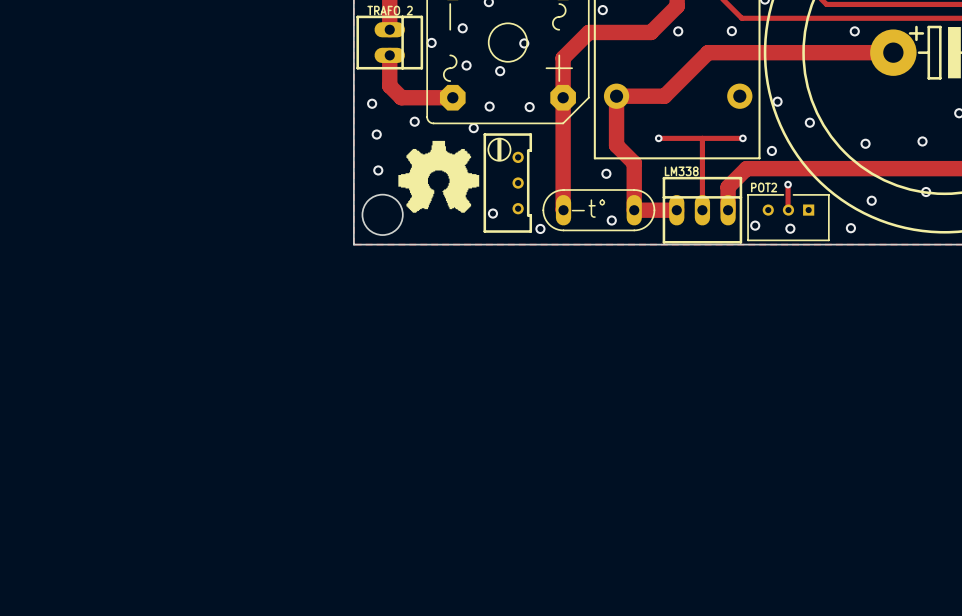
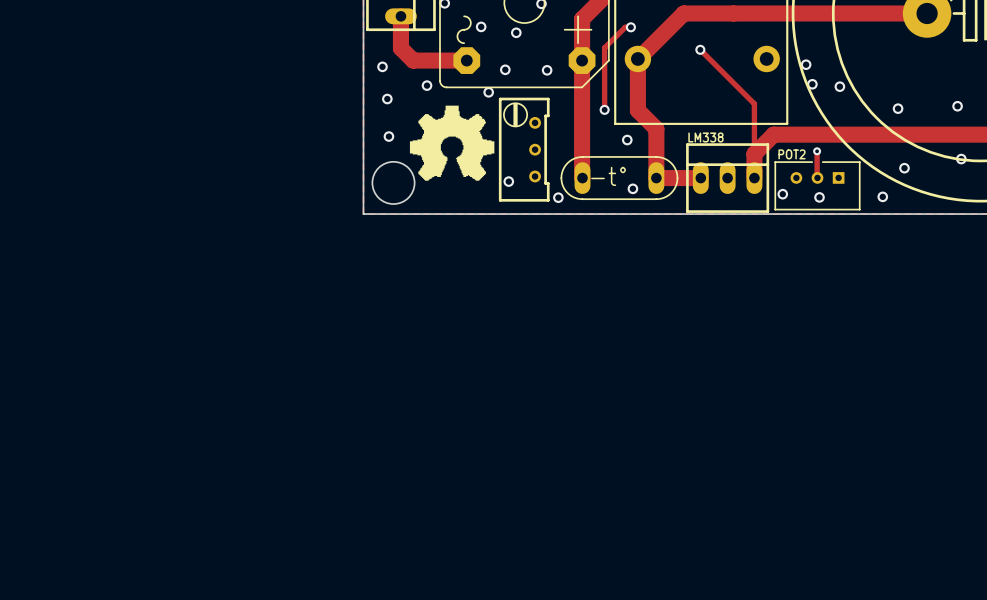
track: (708, 52) (664, 96) (616, 96) -> (733, 13) (683, 13) (638, 58)
track: none -> (630, 27) (625, 27) (604, 47) (604, 109)
via: none -> (630, 27)
track: none -> (700, 49) (754, 103) (754, 178)
via: none -> (700, 49)
track: (658, 138) (742, 138) -> none
via: (658, 138) -> none
track: (702, 138) (702, 210) -> none
via: (742, 138) -> none
via: none -> (604, 109)
via position: (771, 150) -> (812, 84)

